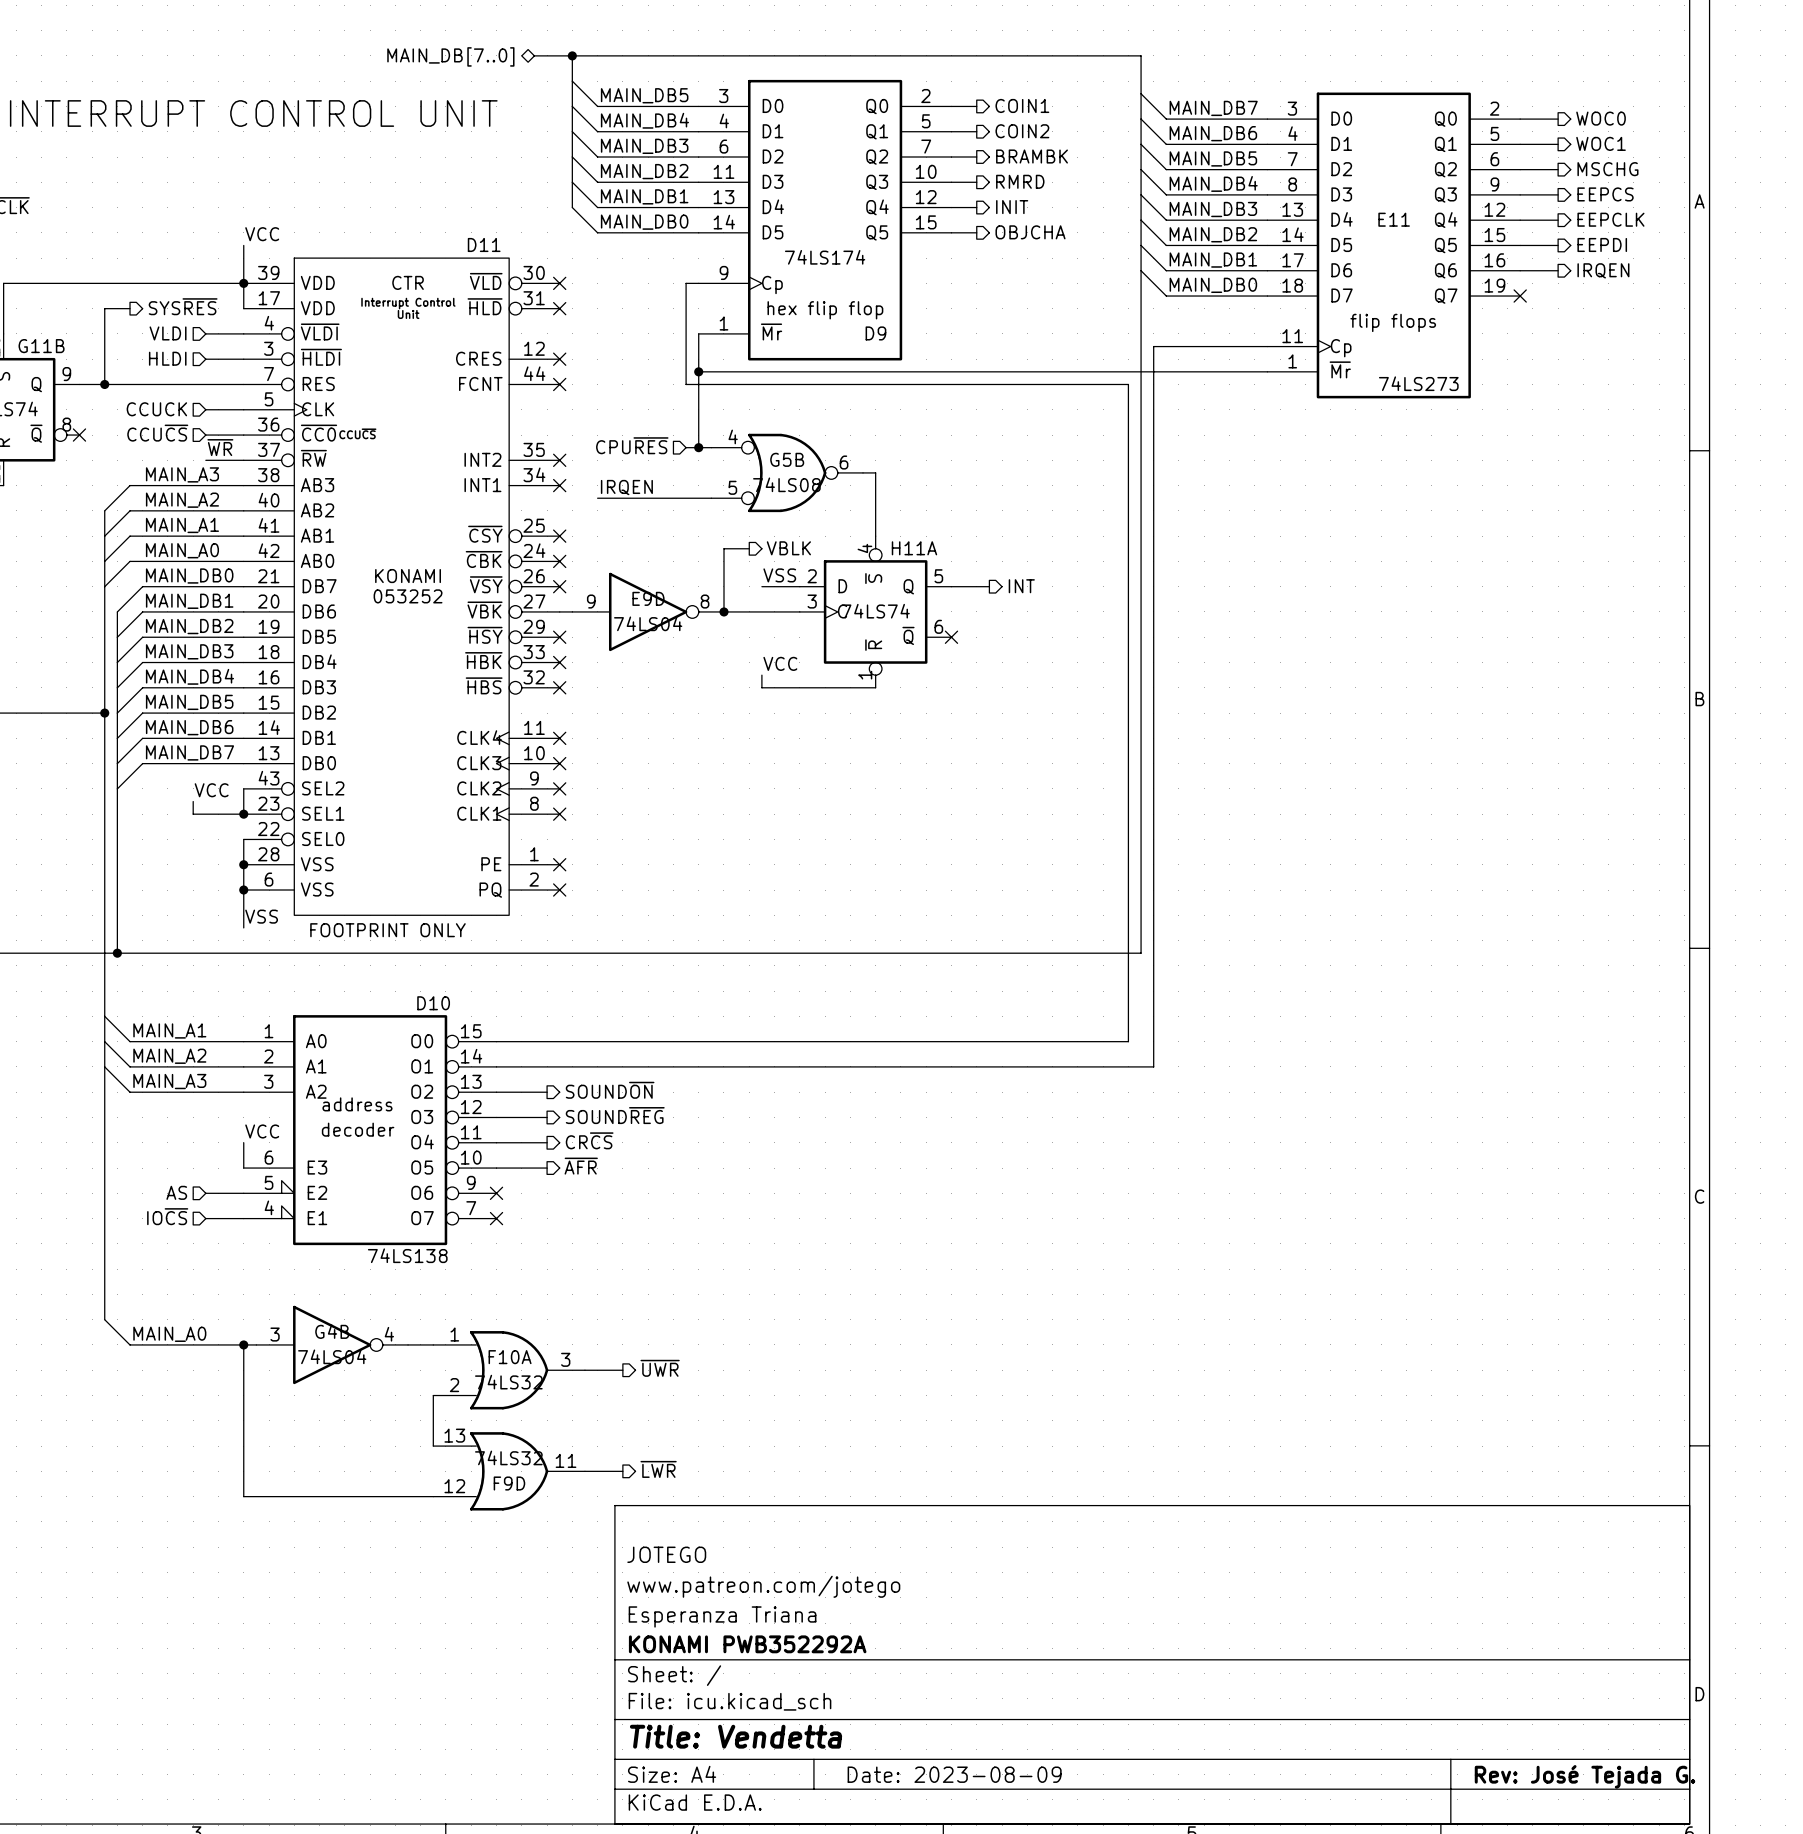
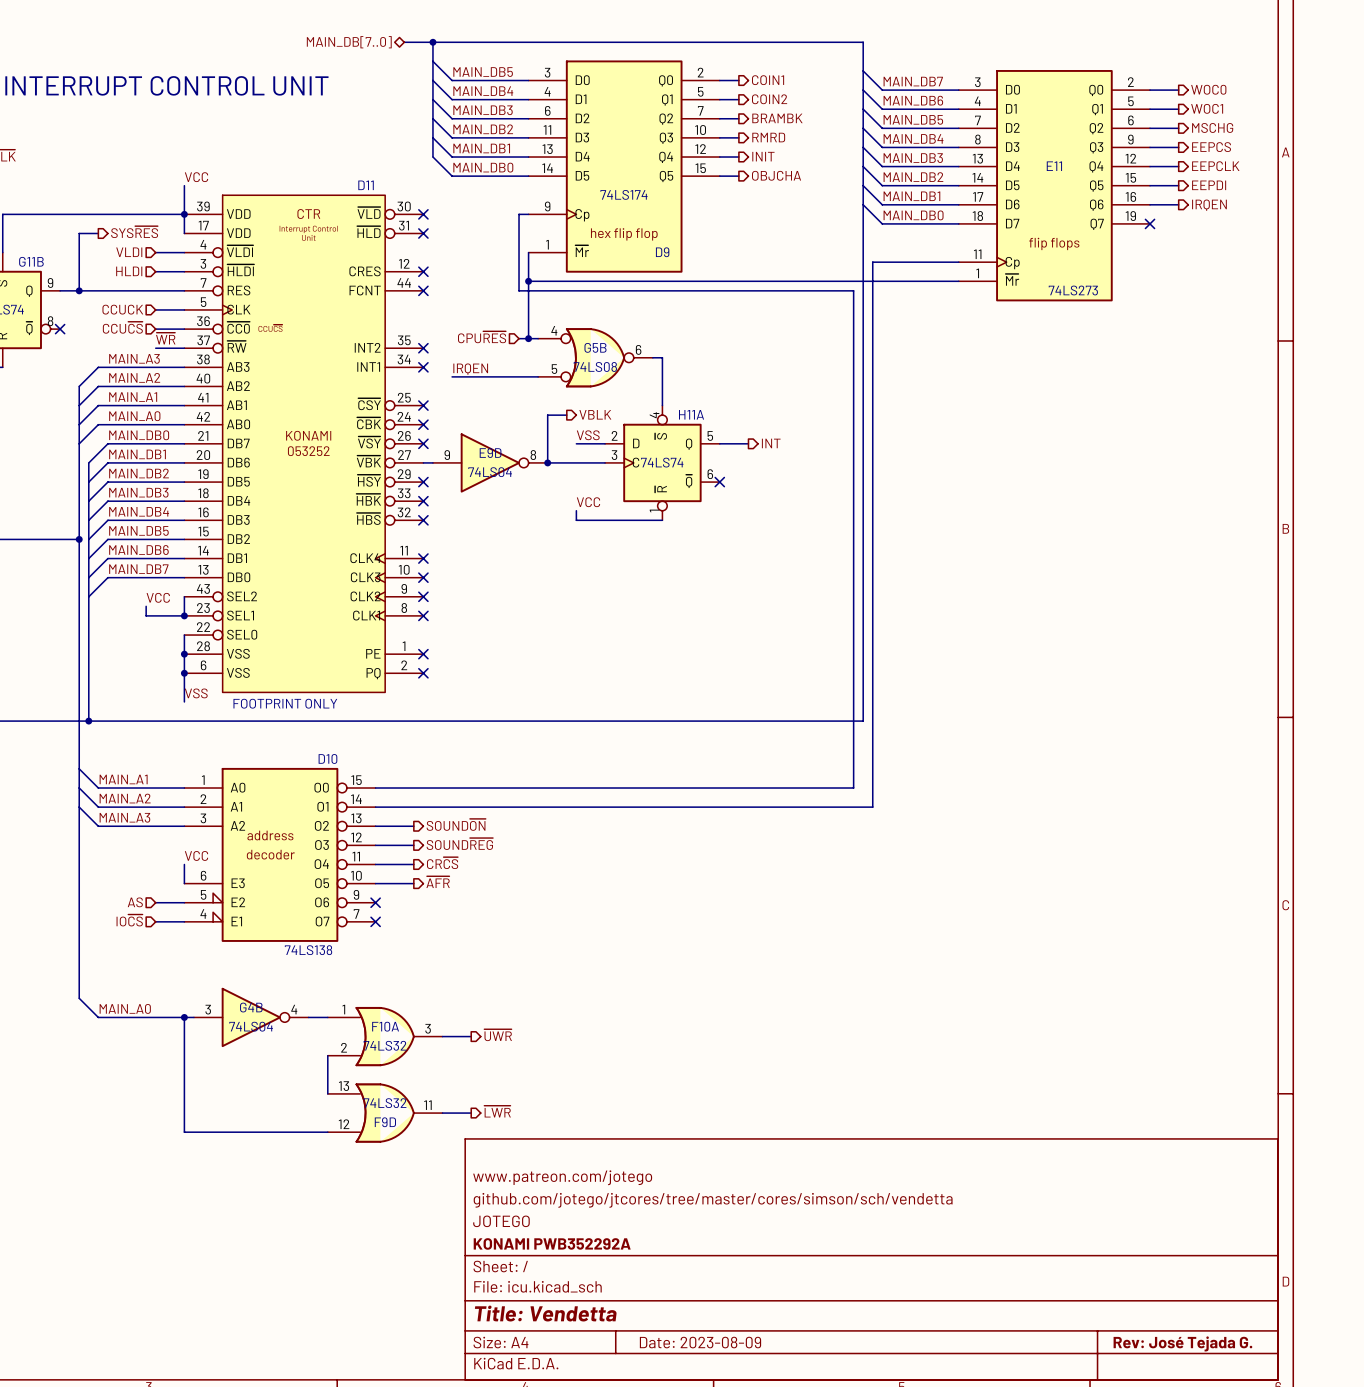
title block: JOTEGO (666, 1554) -> www.patreon.com/jotego (562, 1177)
title block: www.patreon.com/jotego (763, 1586) -> github.com/jotego/jtcores/tree/master/cores/simson/sch/vendetta (713, 1200)
title block: Esperanza Triana (722, 1616) -> JOTEGO (501, 1221)

